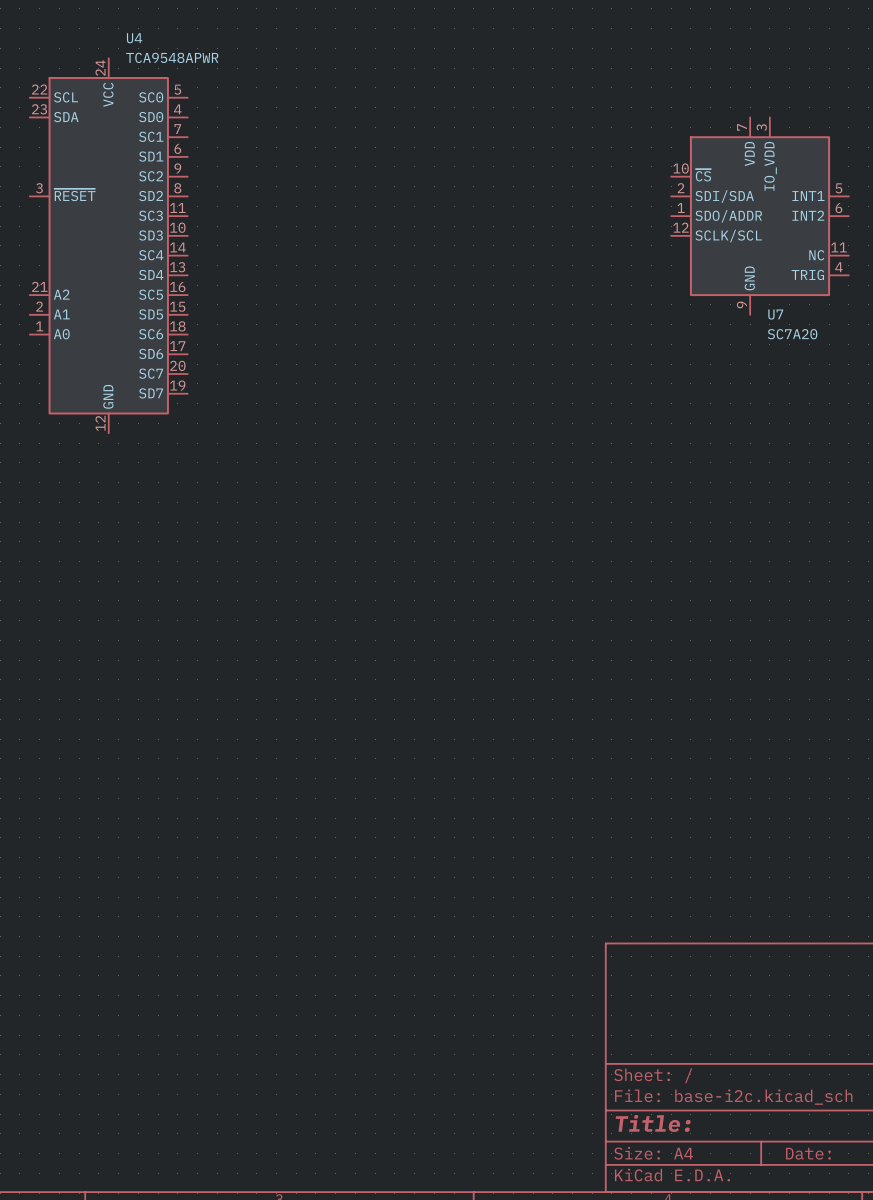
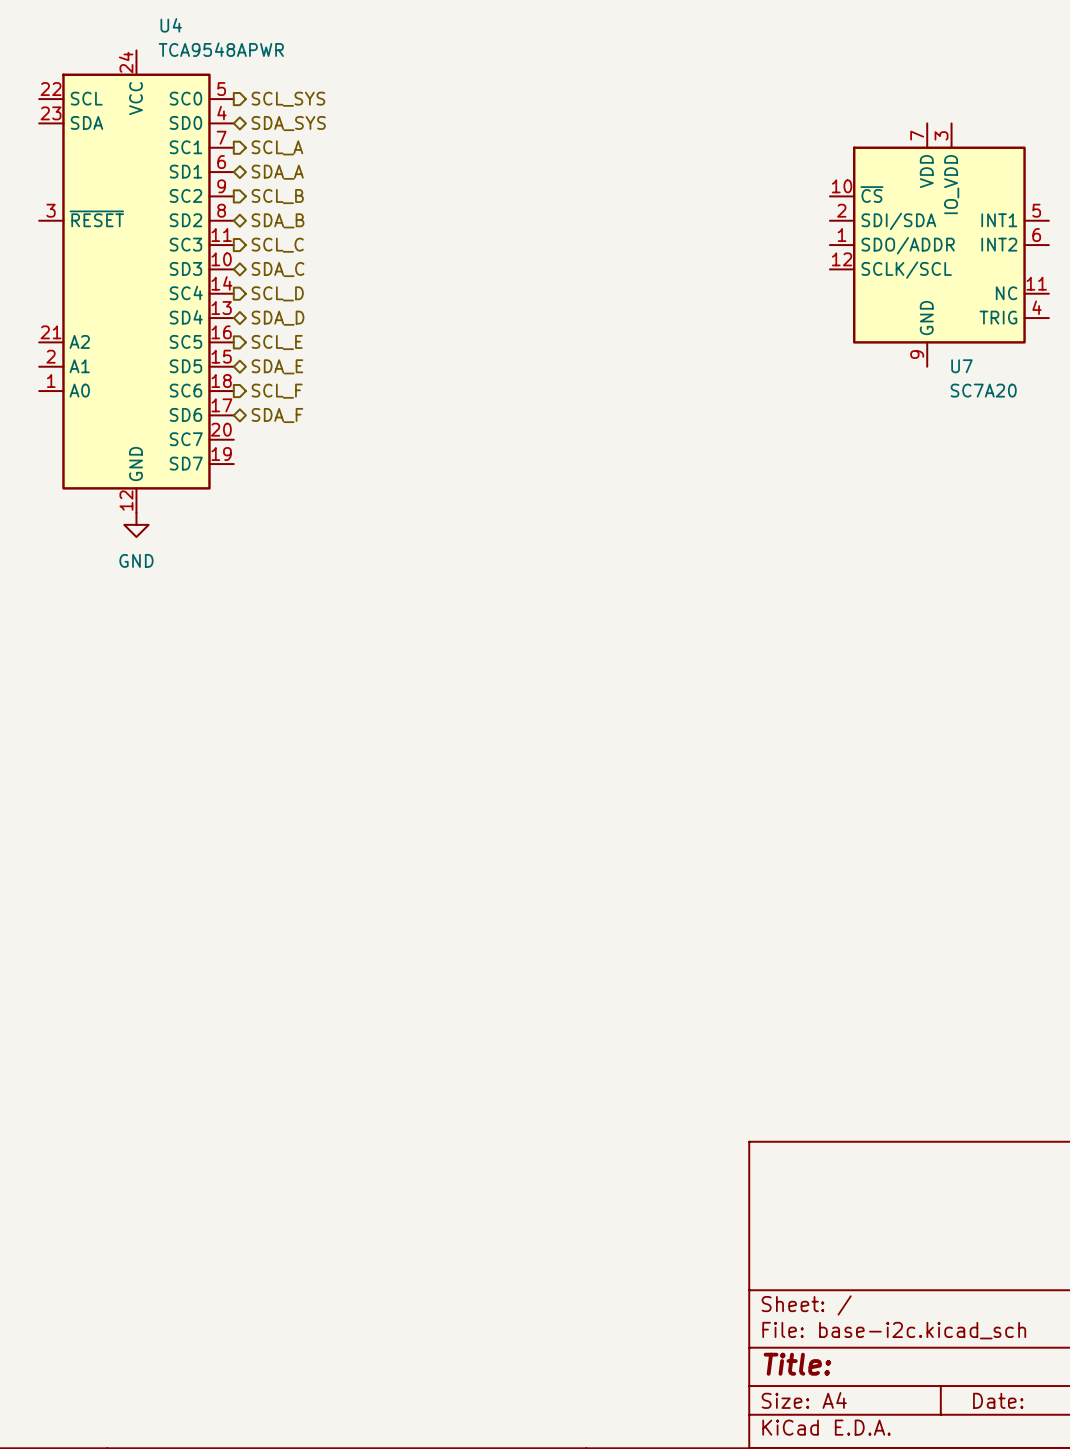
hierarchical label: none -> SCL_SYS (288, 99)
hierarchical label: none -> SDA_SYS (288, 123)
hierarchical label: none -> SCL_A (277, 147)
hierarchical label: none -> SDA_A (277, 172)
hierarchical label: none -> SCL_B (277, 196)
hierarchical label: none -> SDA_B (278, 220)
hierarchical label: none -> SCL_C (277, 245)
hierarchical label: none -> SDA_C (278, 269)
hierarchical label: none -> SCL_D (277, 293)
hierarchical label: none -> SDA_D (278, 318)
hierarchical label: none -> SCL_E (277, 342)
hierarchical label: none -> SDA_E (277, 366)
hierarchical label: none -> SCL_F (277, 391)
hierarchical label: none -> SDA_F (277, 415)
power symbol: none -> GND (136, 524)

